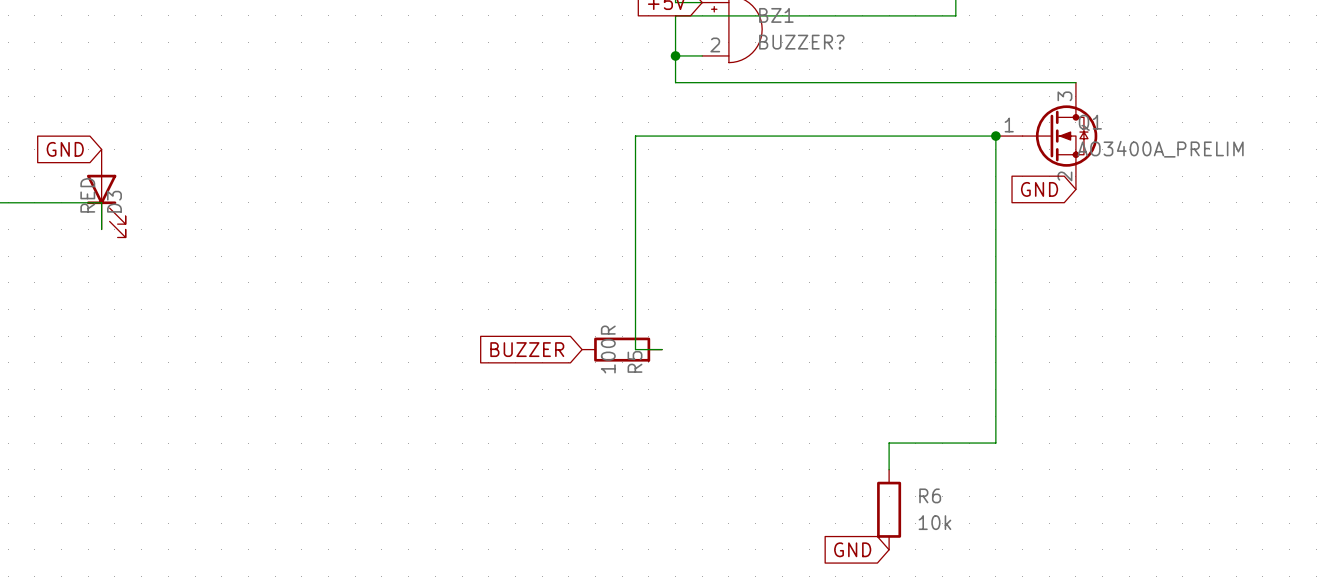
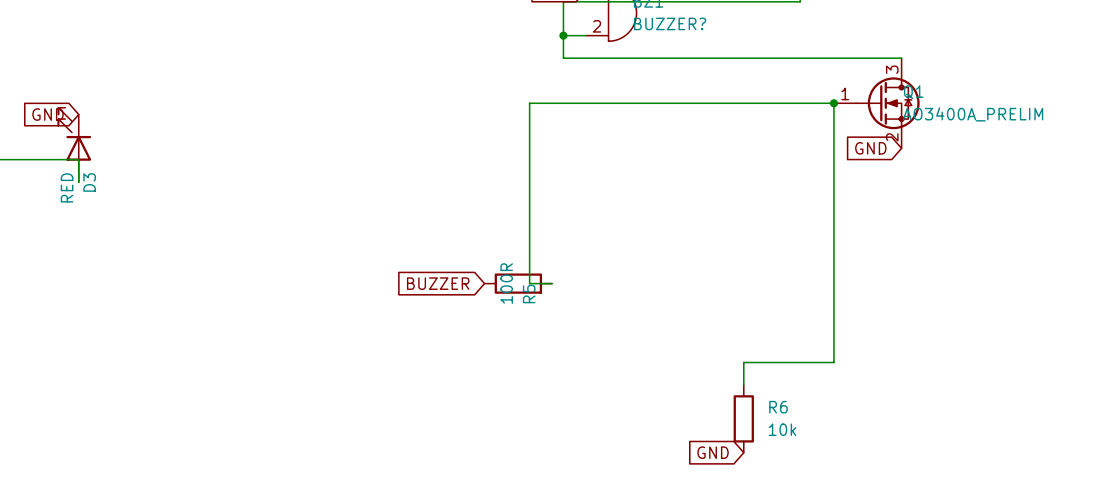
D3 value position: RED (87, 195) -> RED (67, 187)
D3 name position: D3 (114, 201) -> D3 (89, 182)
D3 rotation: 0° (106, 206) -> 180° (74, 134)

